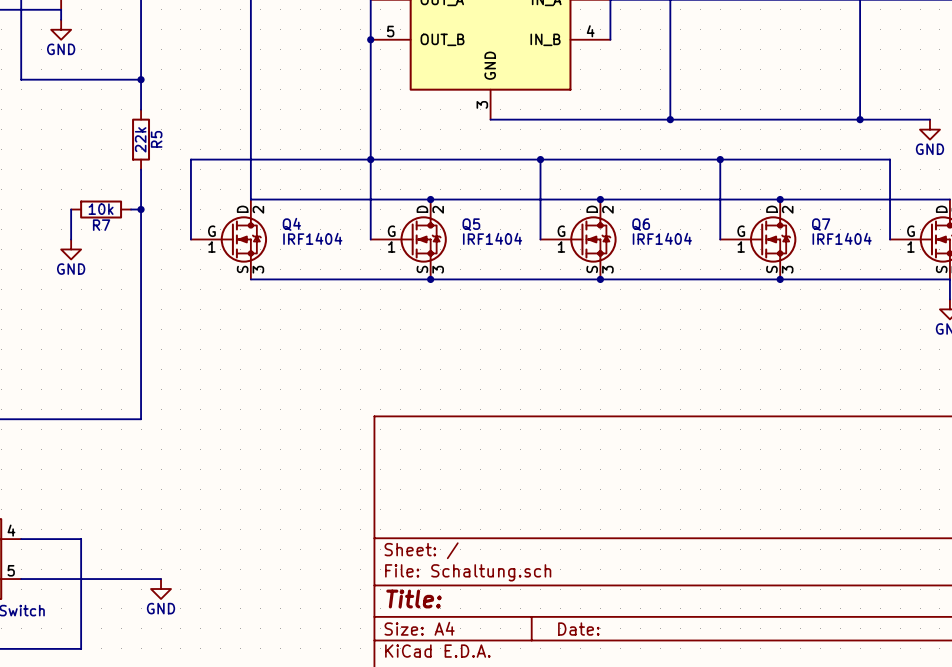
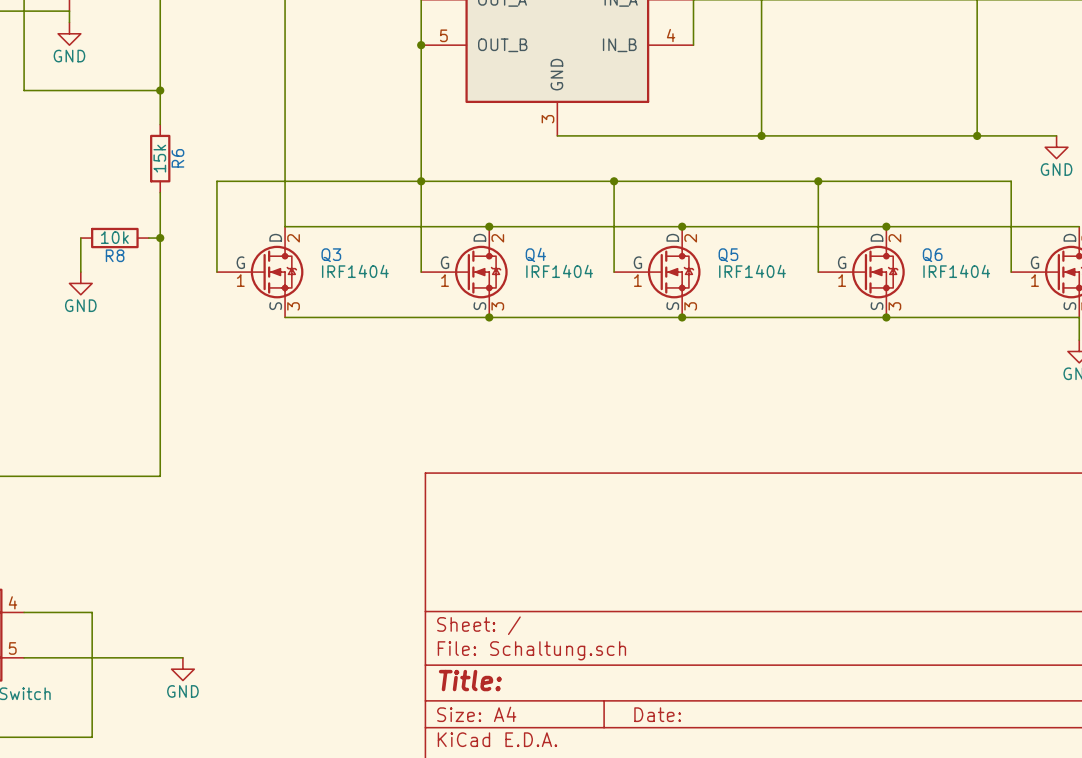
R5 value: 22k (140, 139) -> 15k (159, 158)
R5 name: R5 (156, 139) -> R6 (177, 158)
Q4 name: Q4 (291, 224) -> Q3 (331, 255)
Q5 name: Q5 (471, 224) -> Q4 (535, 254)
Q6 name: Q6 (641, 224) -> Q5 (728, 255)
Q7 name: Q7 (821, 224) -> Q6 (932, 255)
R7 name: R7 (101, 225) -> R8 (115, 255)

